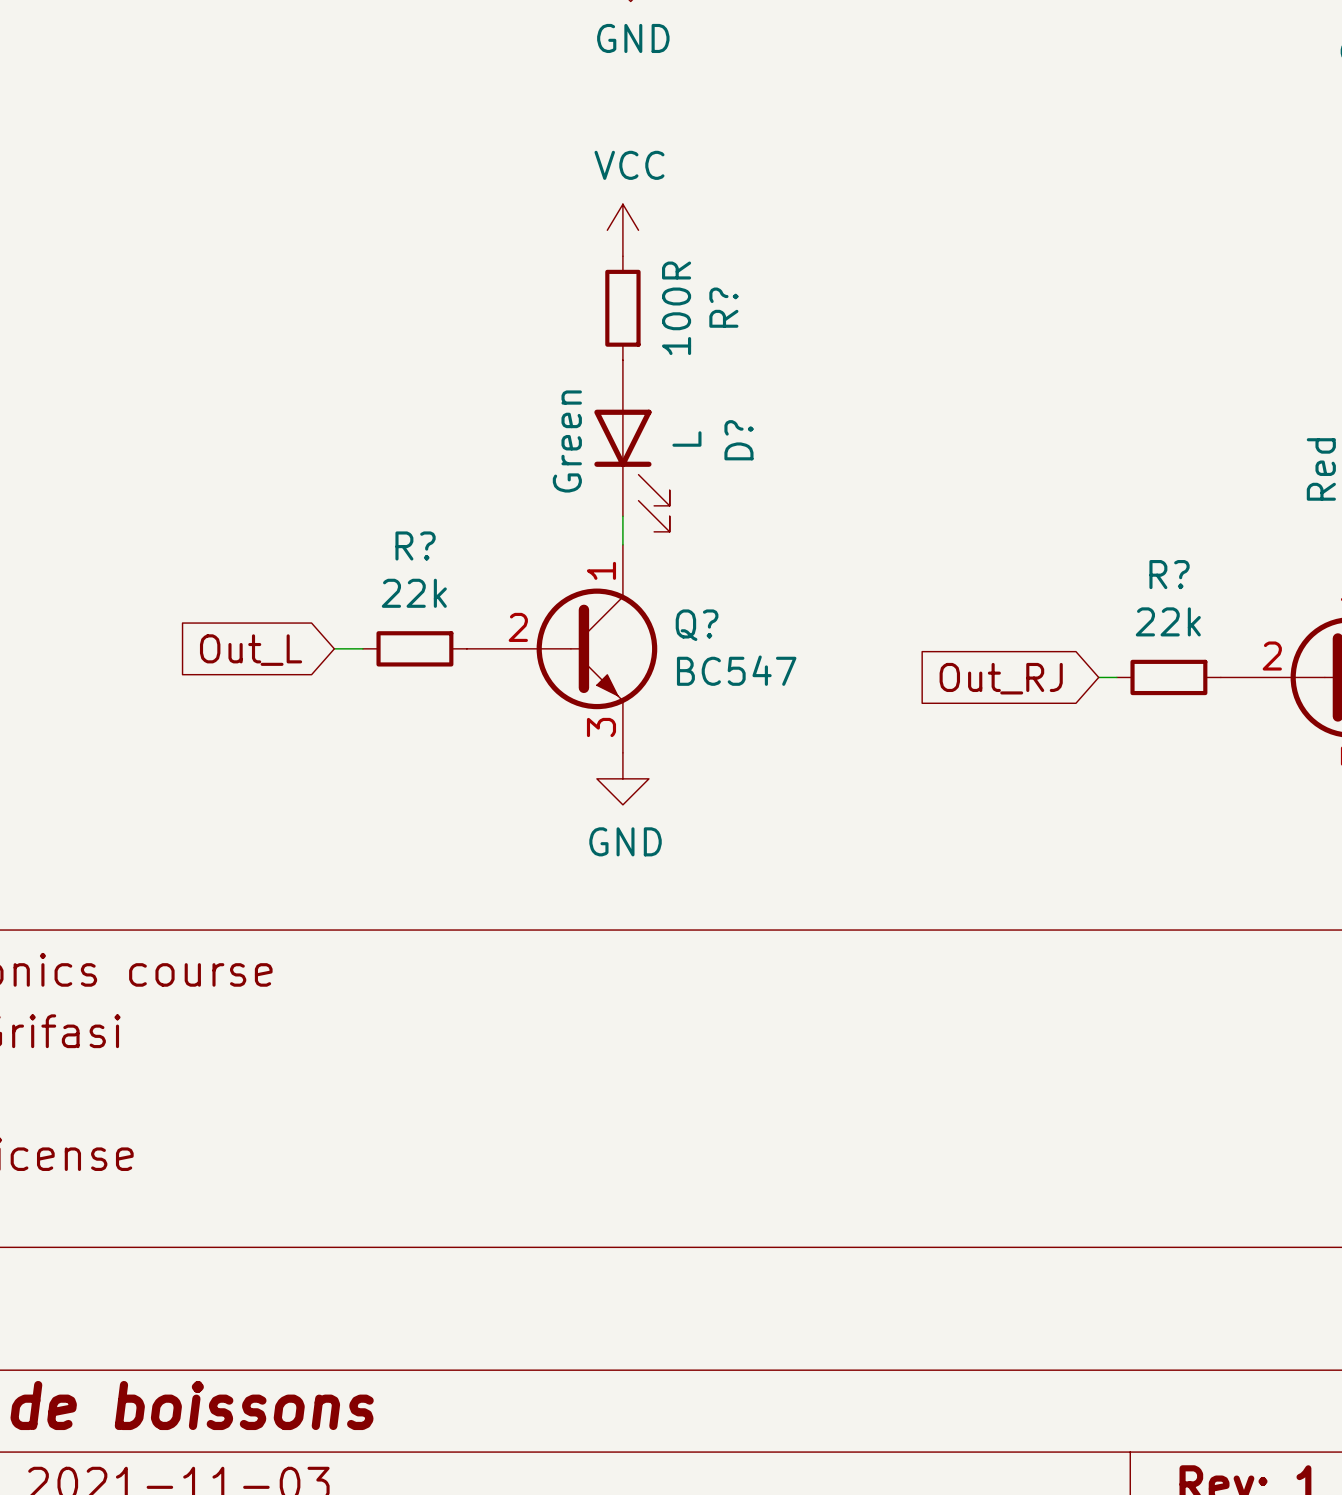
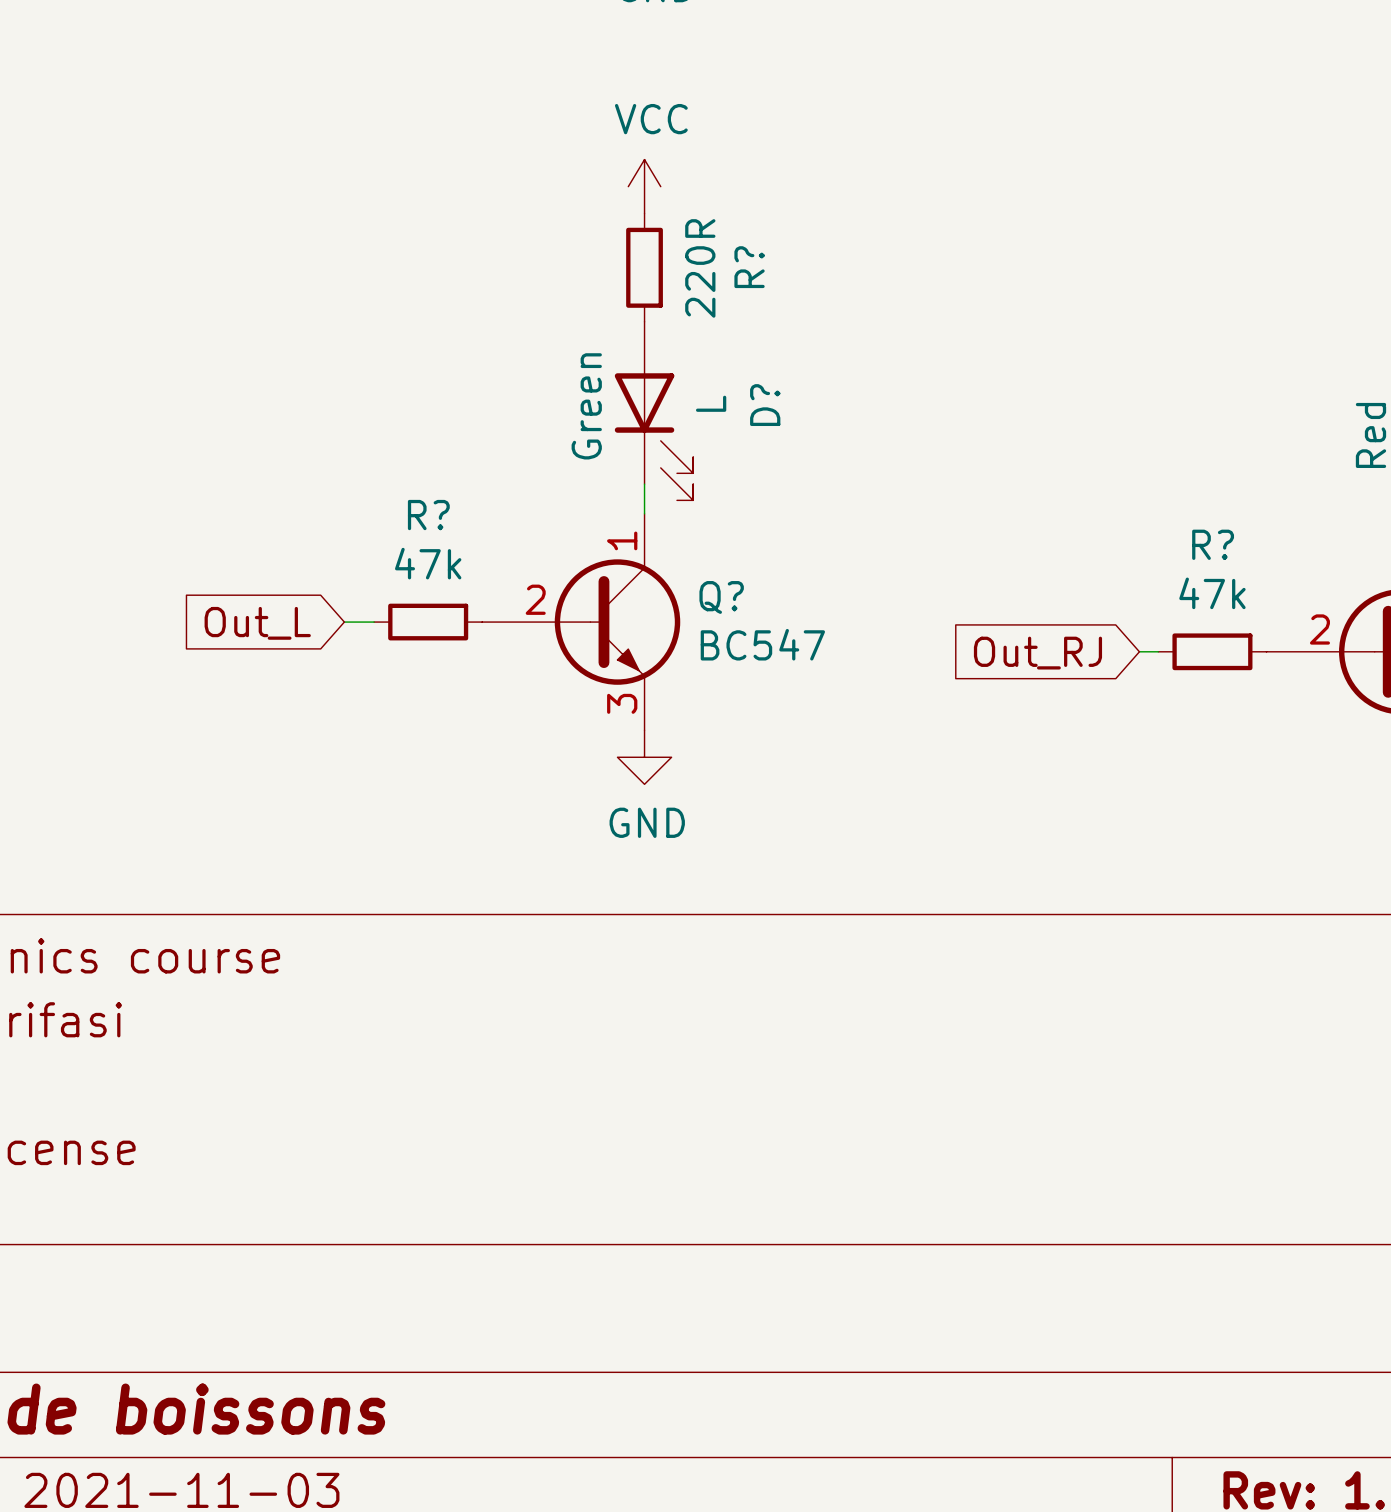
R? value: 100R (676, 308) -> 220R (700, 268)
R? value: 22k (414, 593) -> 47k (428, 563)
R? value: 22k (1168, 621) -> 47k (1212, 593)

